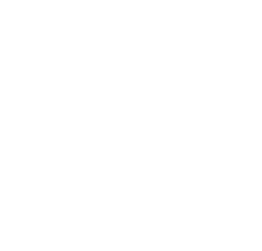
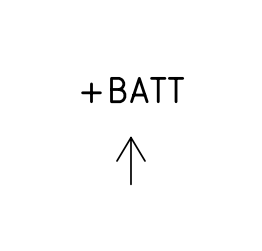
power symbol: none -> +BATT (130, 161)

